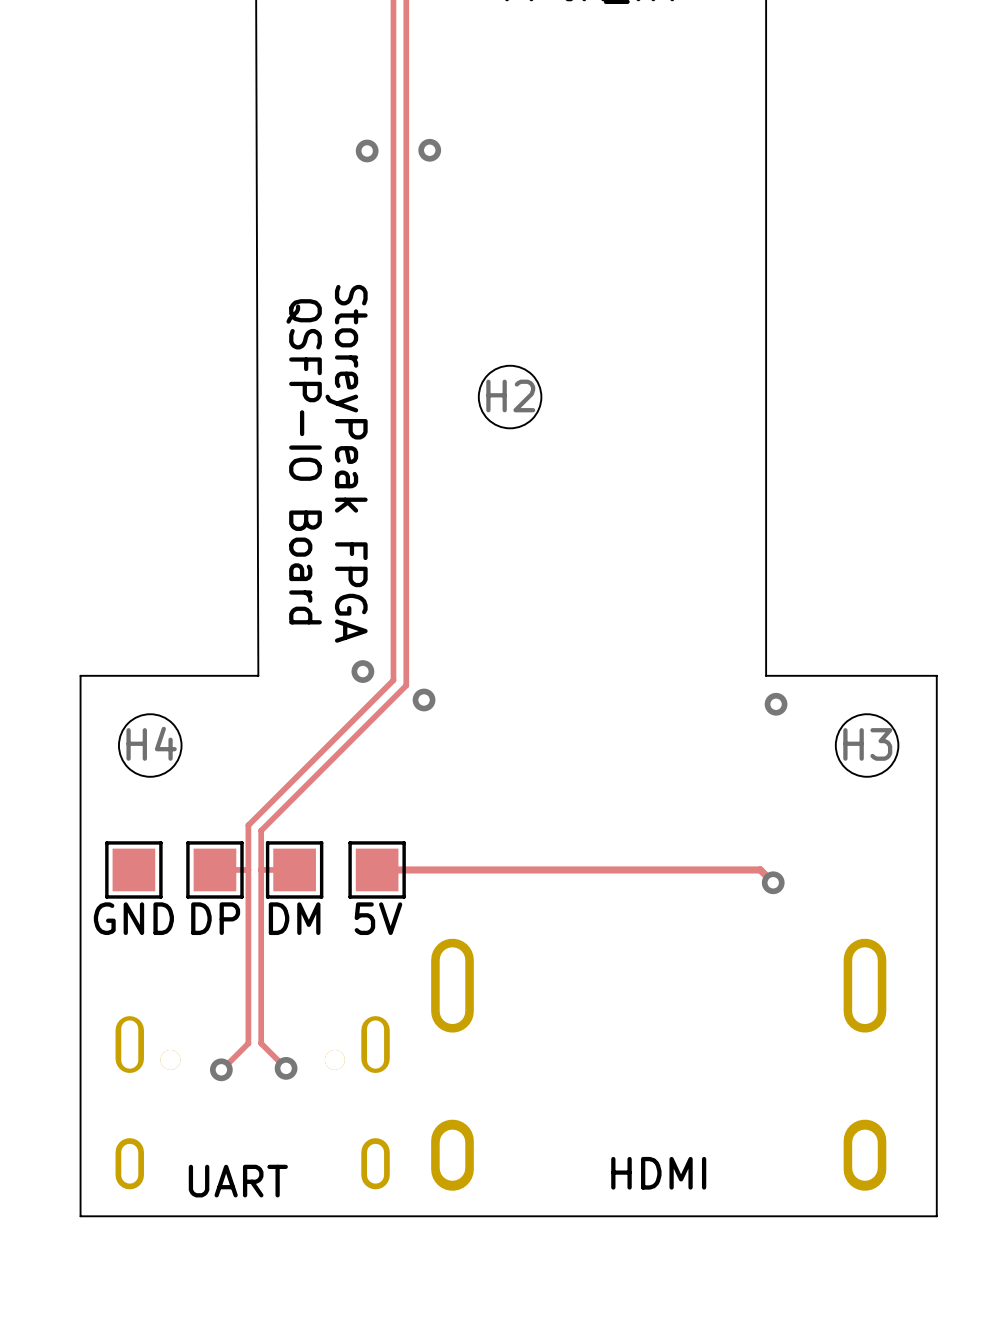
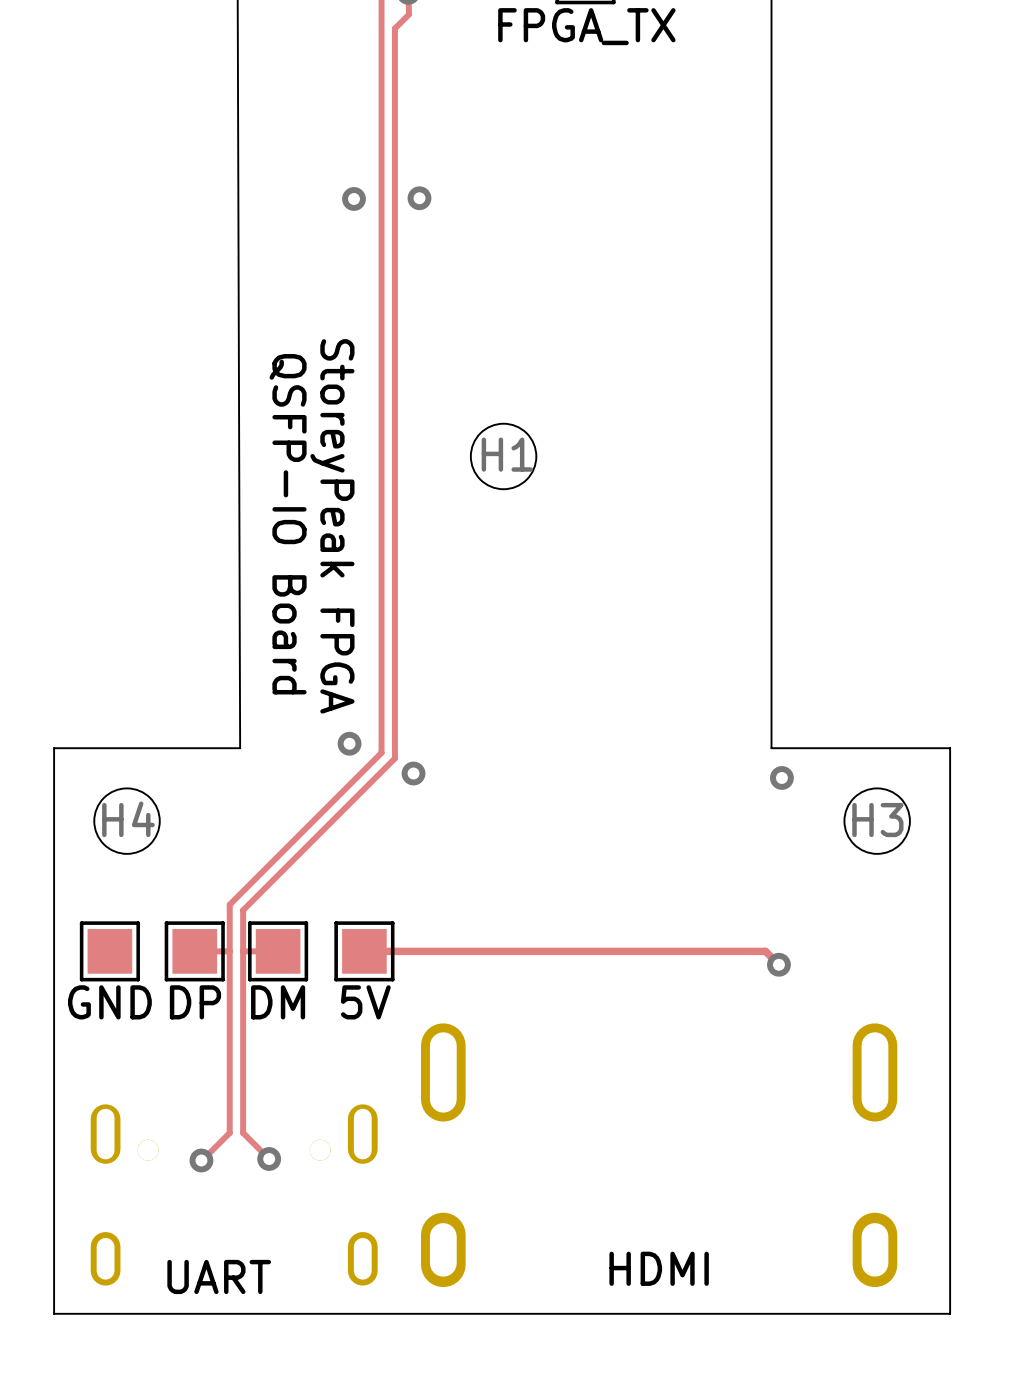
H2 name: H2 (510, 395) -> H1 (507, 454)

